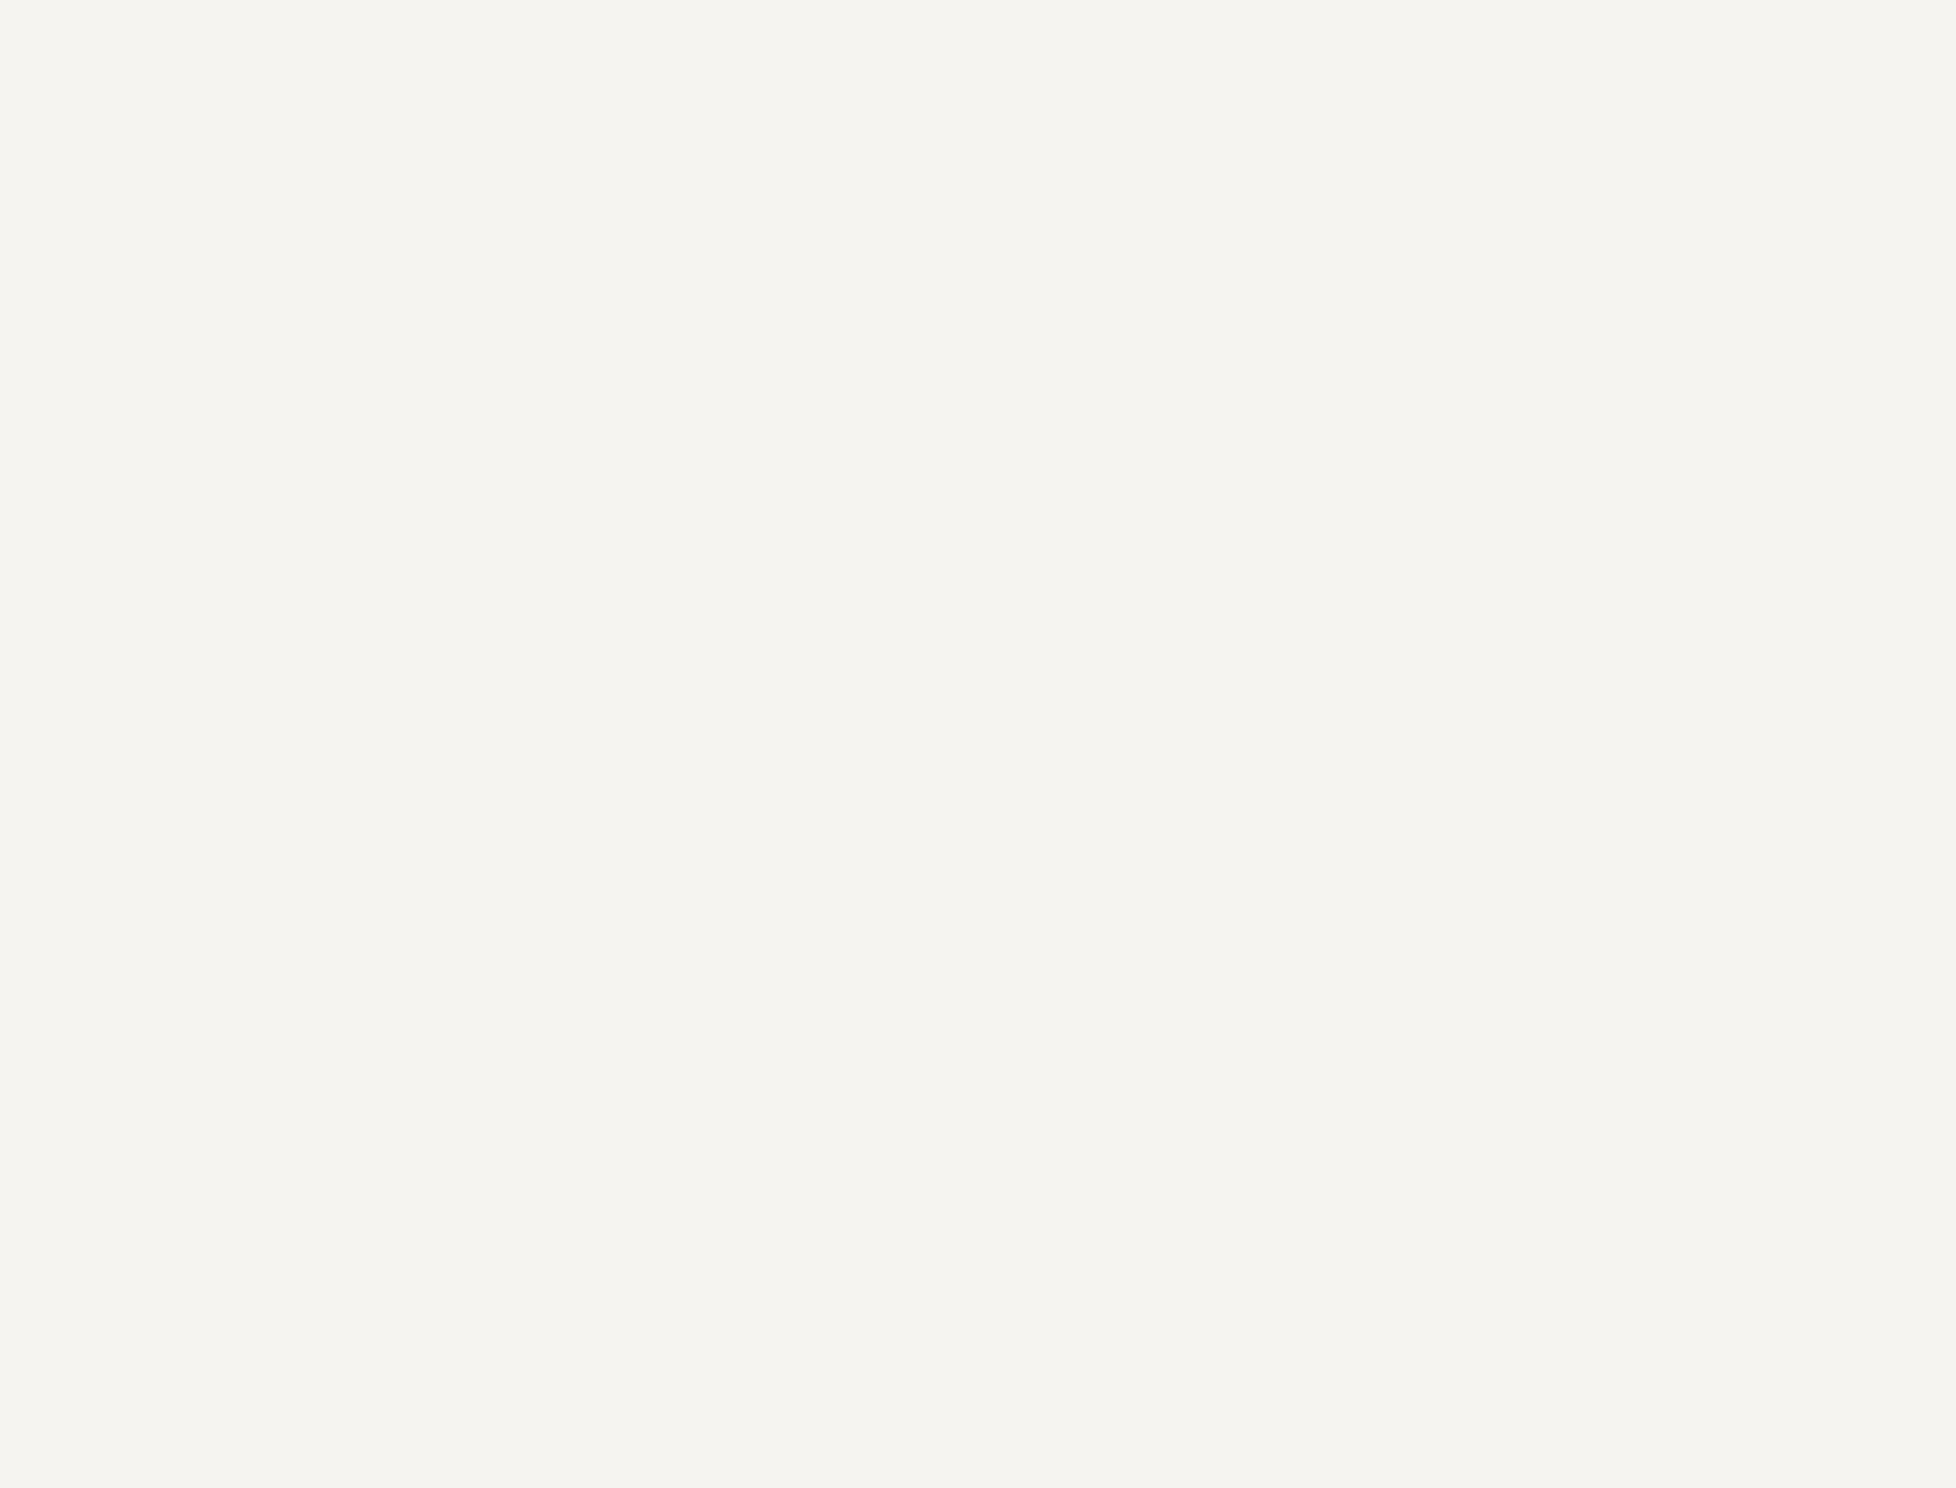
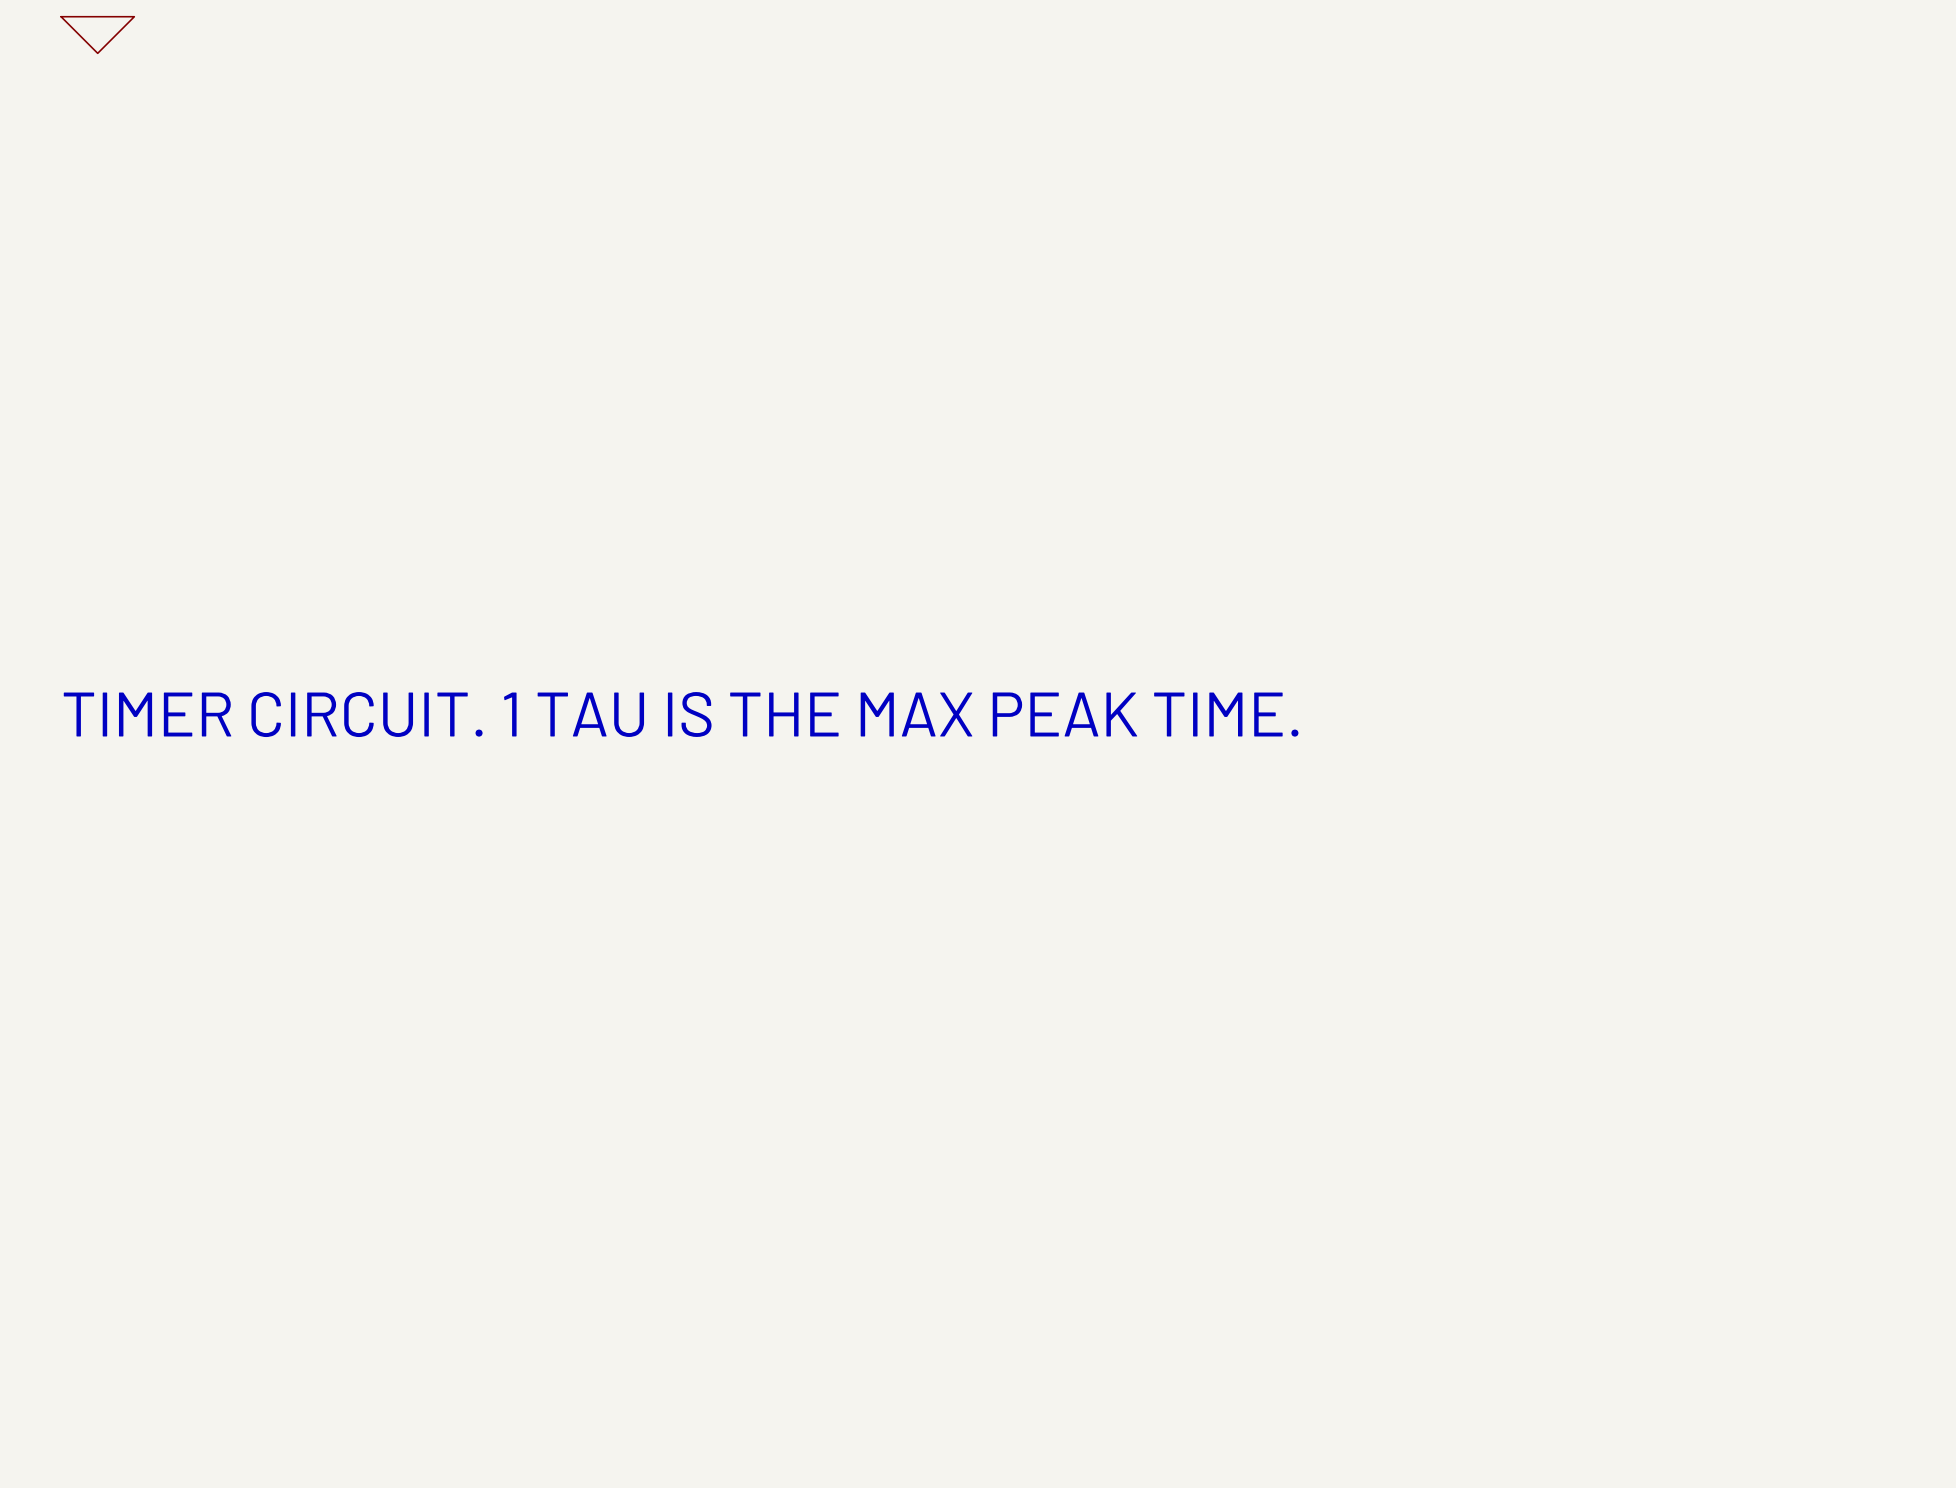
power symbol: none -> (97, 35)
text: none -> TIMER CIRCUIT. 1 TAU IS THE MAX PEAK TIME. (681, 714)

